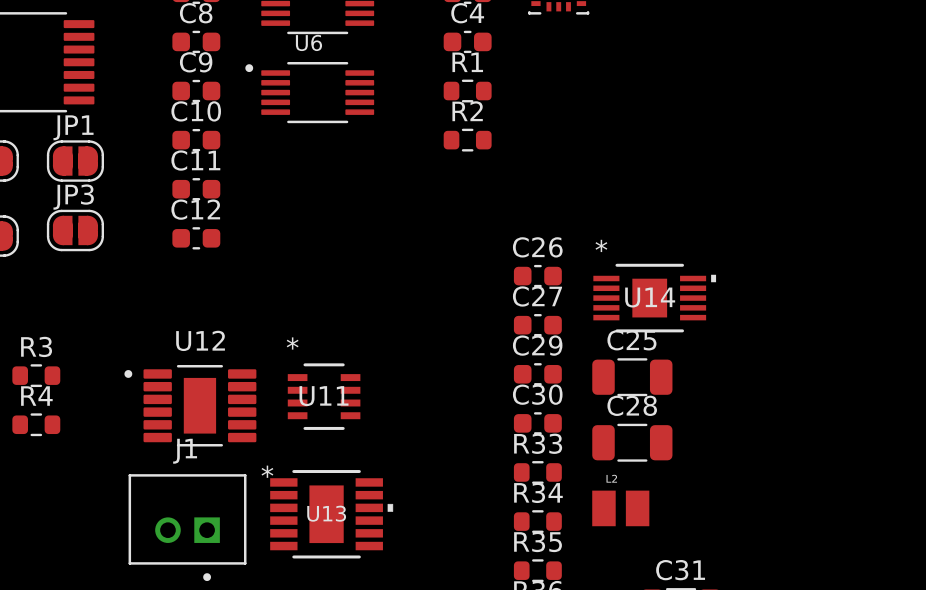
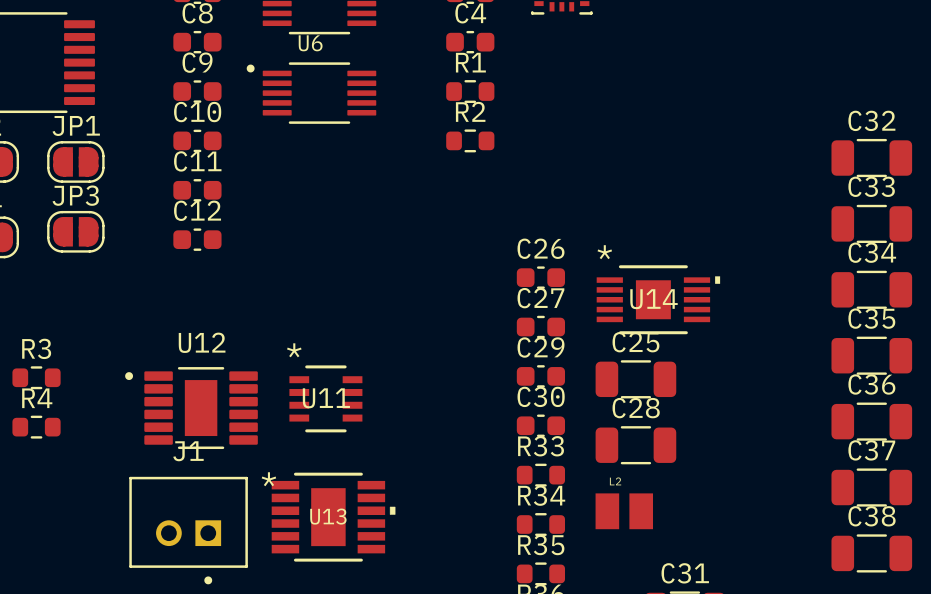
C32: none -> (871, 158)
C33: none -> (871, 223)
C34: none -> (871, 289)
C35: none -> (871, 355)
C36: none -> (871, 421)
C37: none -> (871, 487)
C38: none -> (871, 553)

